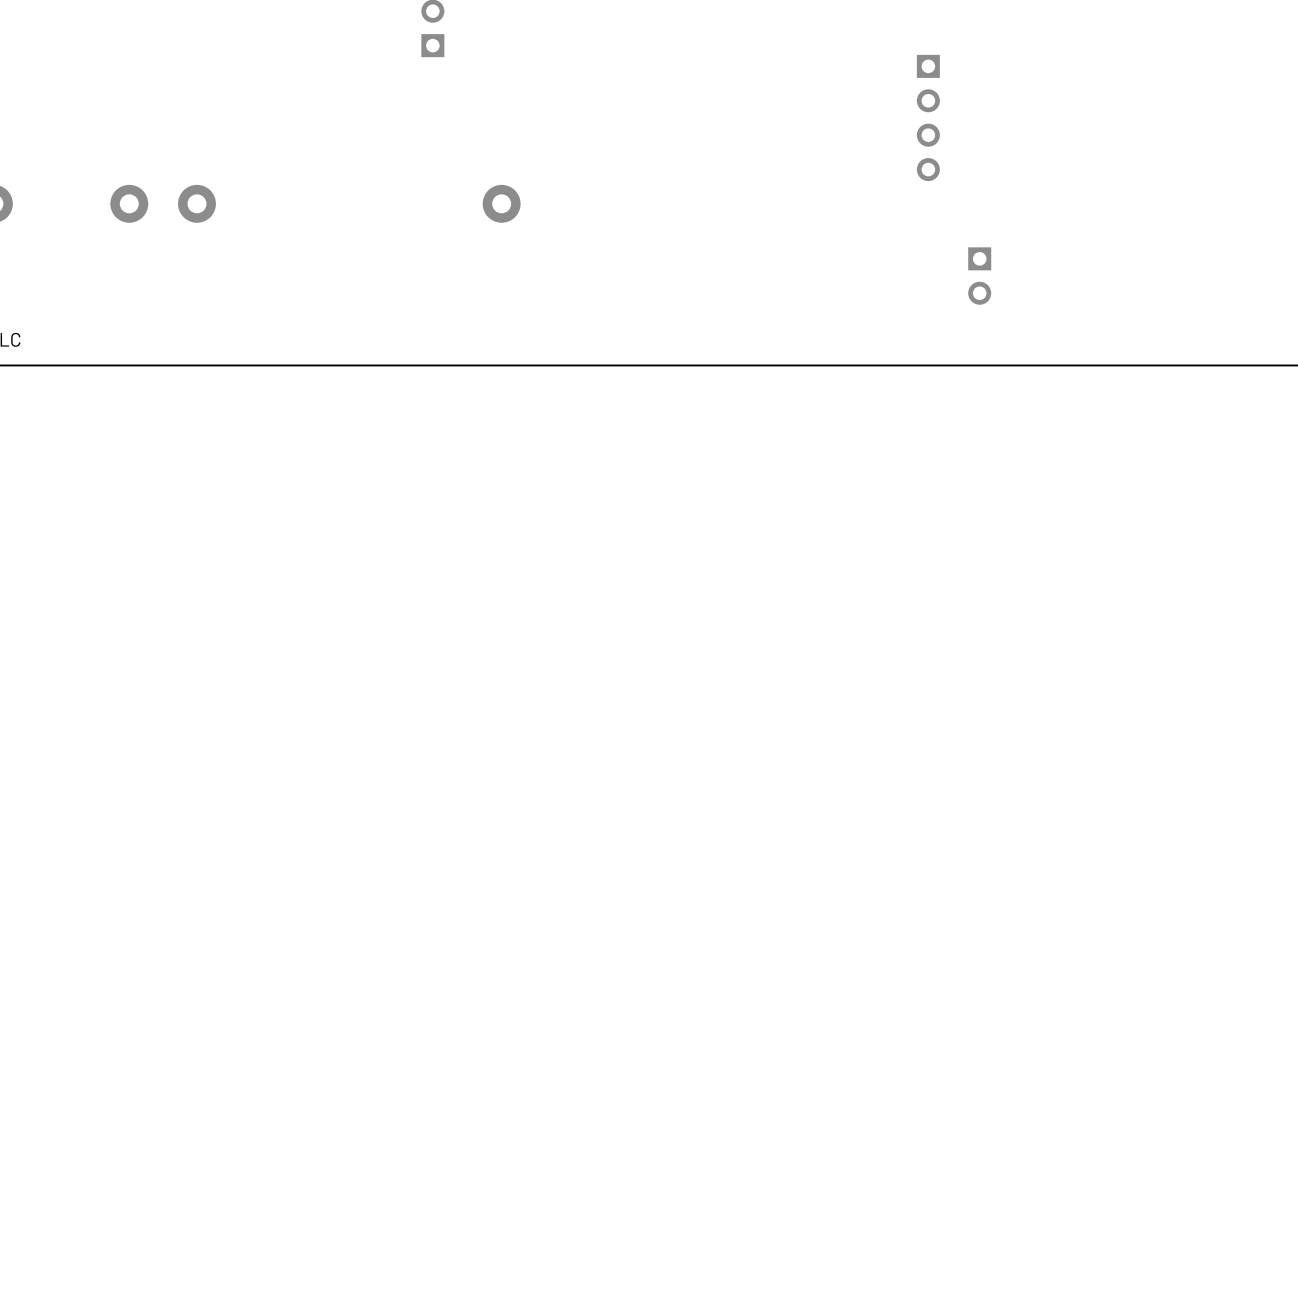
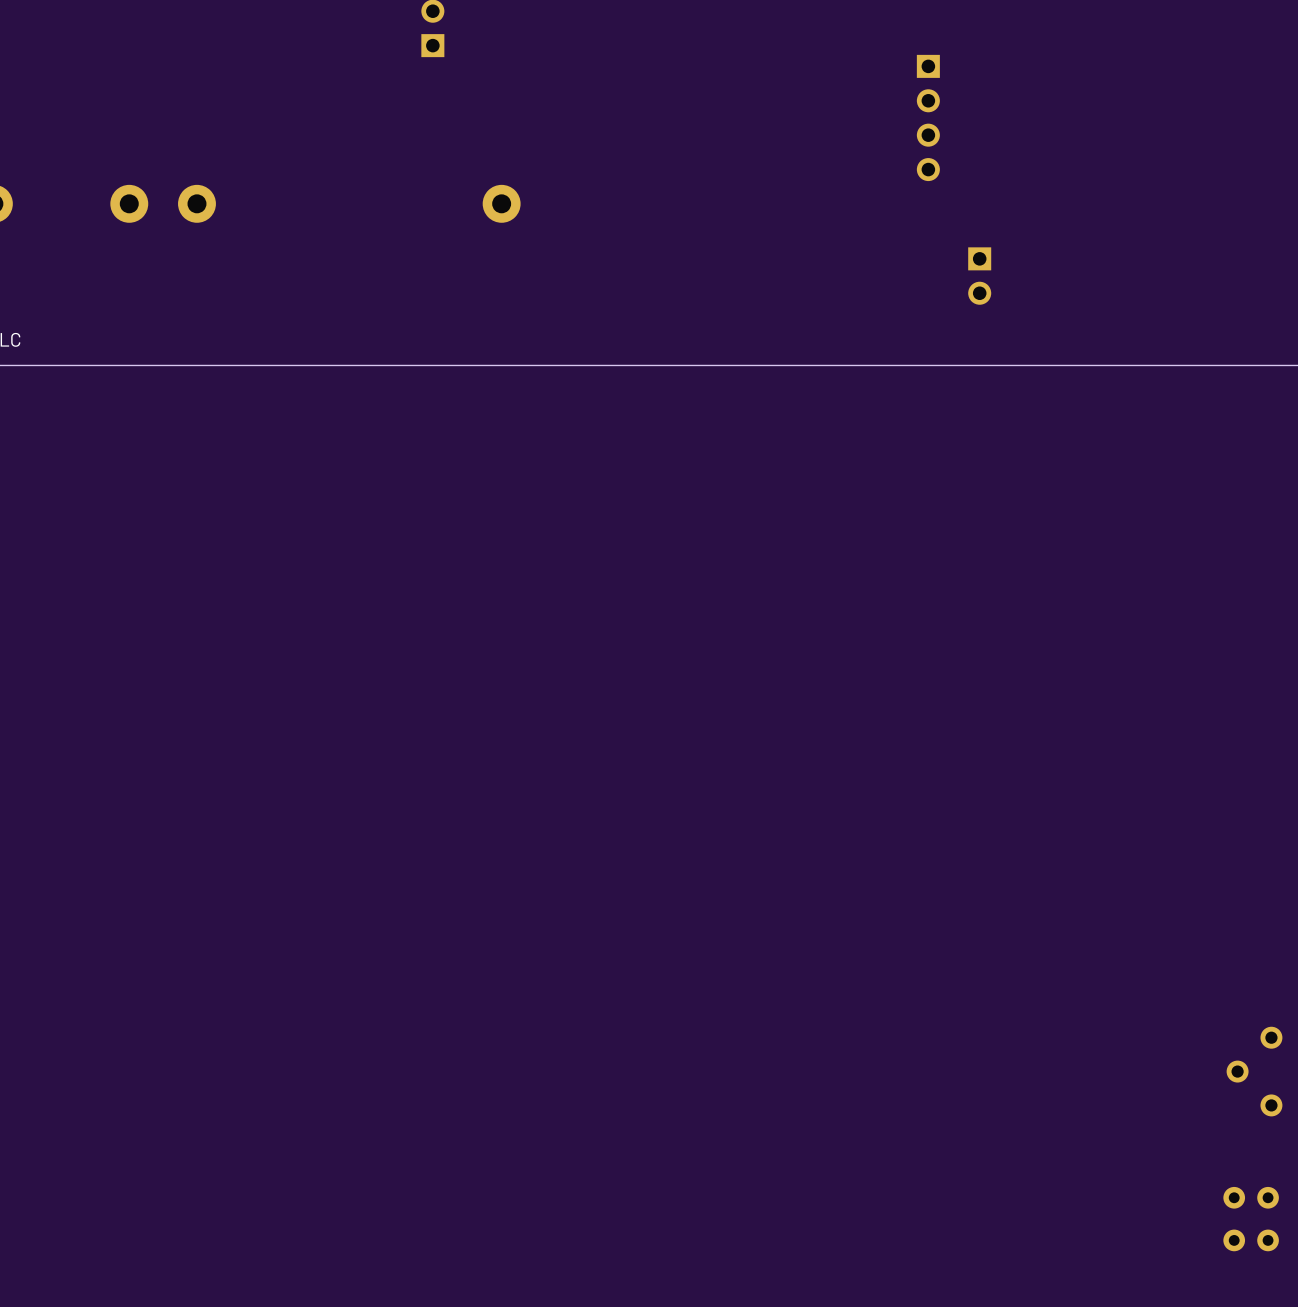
part: none -> (1254, 1071)
part: none -> (1251, 1197)
part: none -> (1251, 1240)

